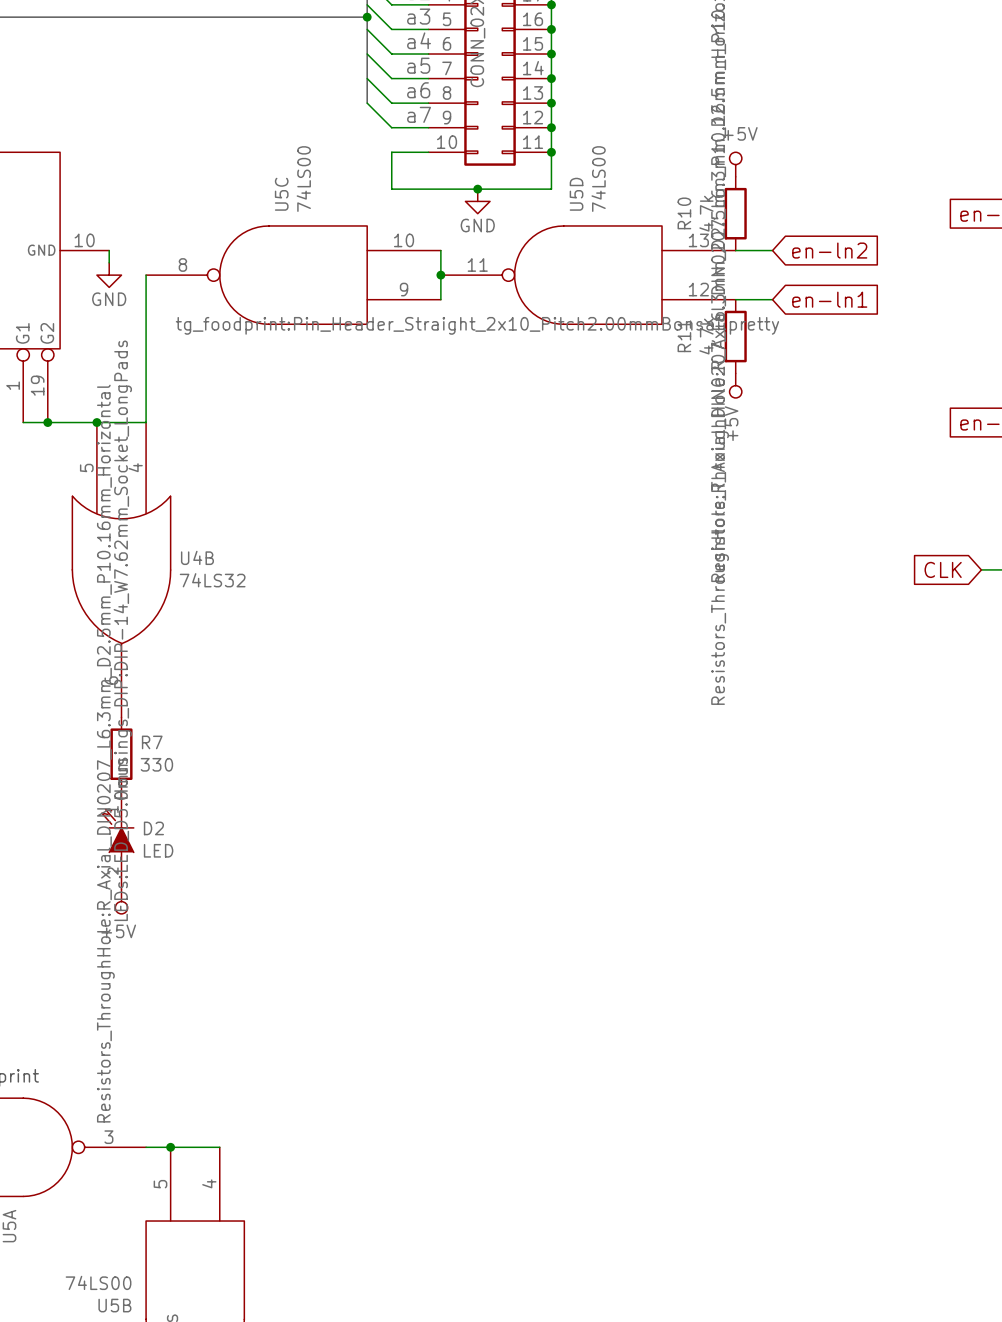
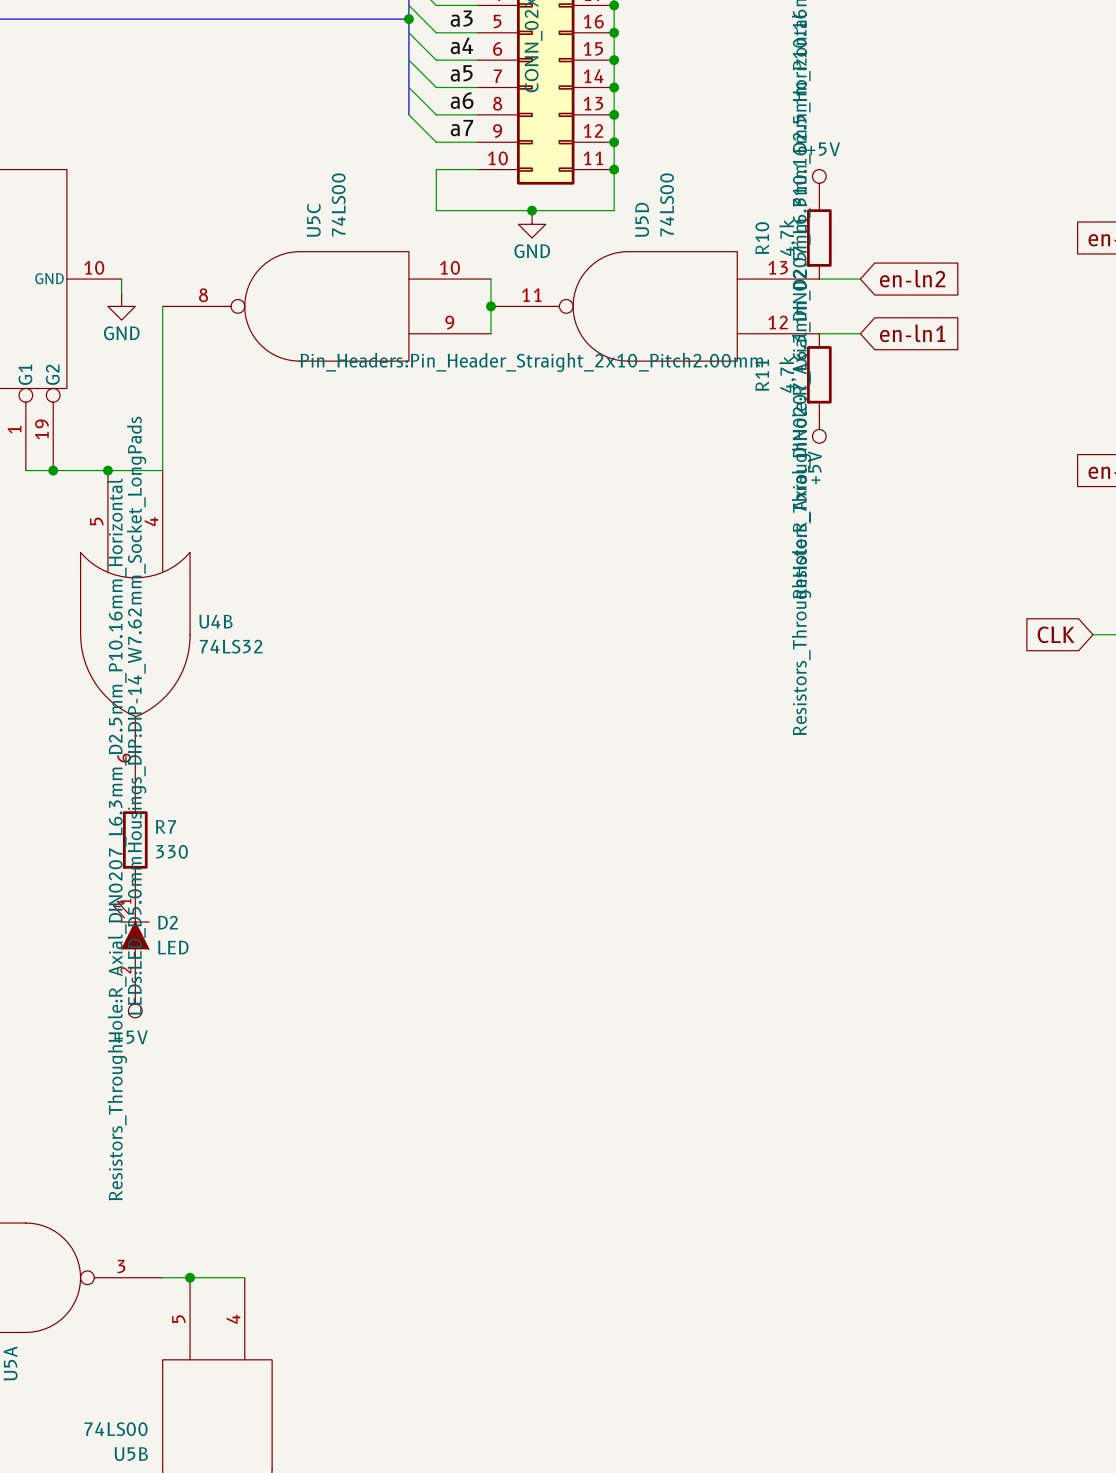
part text: tg_foodprint:Pin_Header_Straight_2x10_Pitch2.00mmBonsai.pretty (477, 325) -> Pin_Headers:Pin_Header_Straight_2x10_Pitch2.00mm (531, 362)

